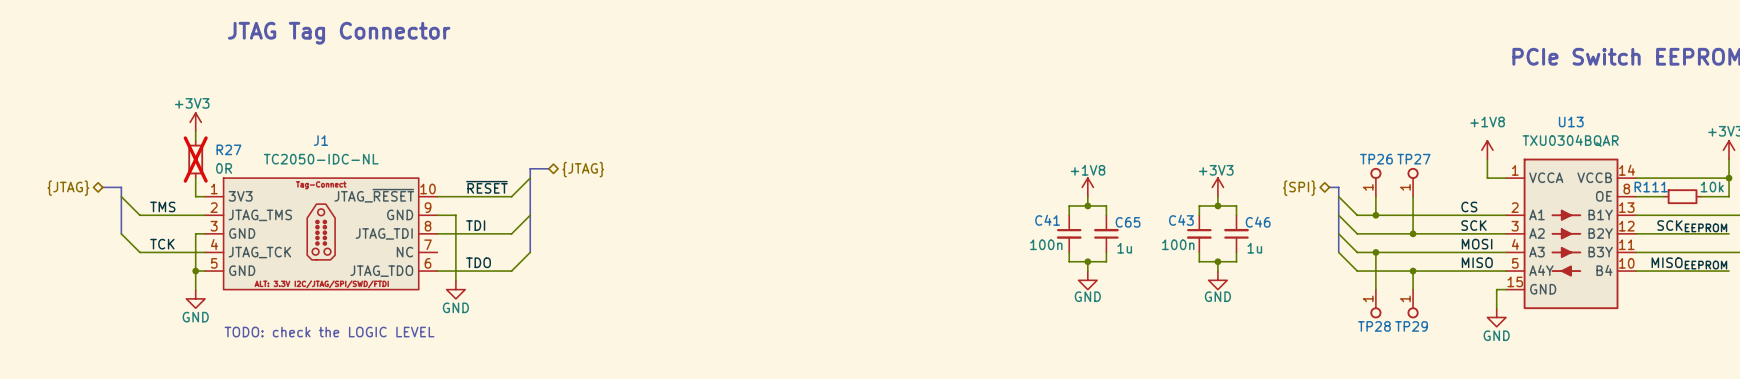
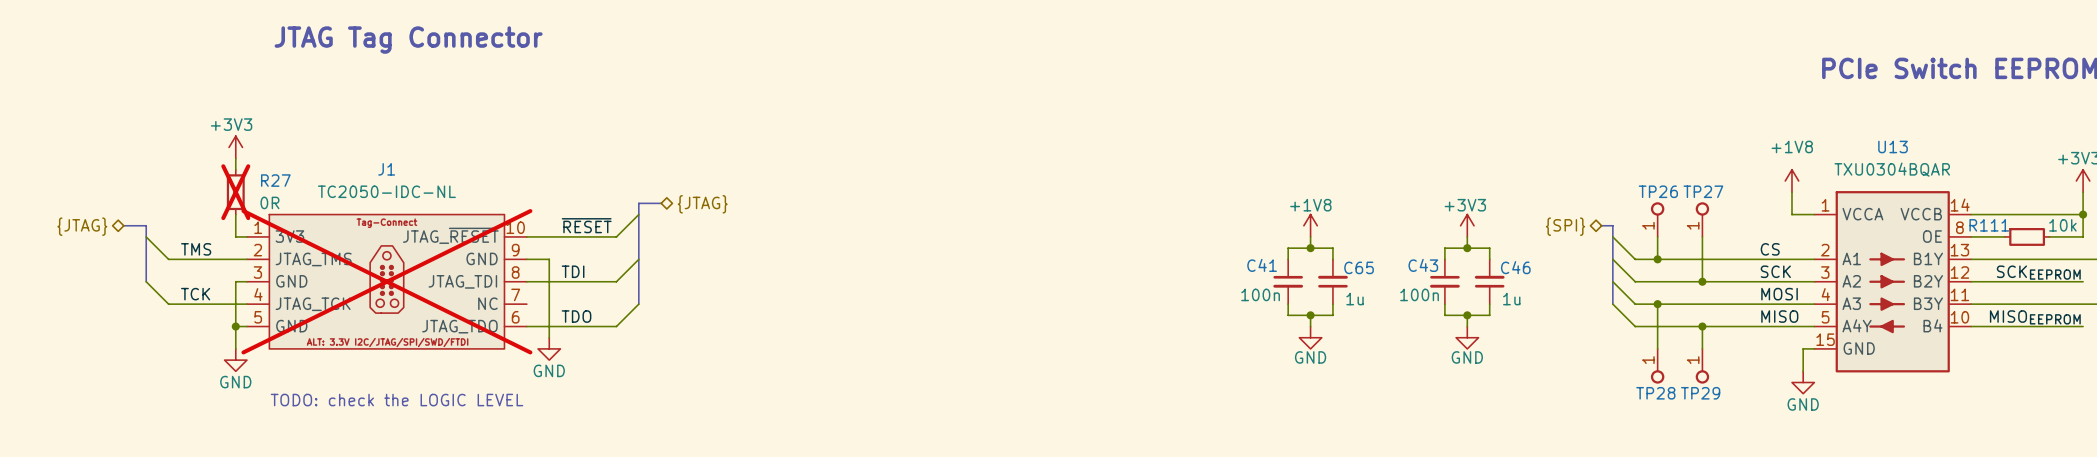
J1 do-not-place cross: none -> (386, 281)

